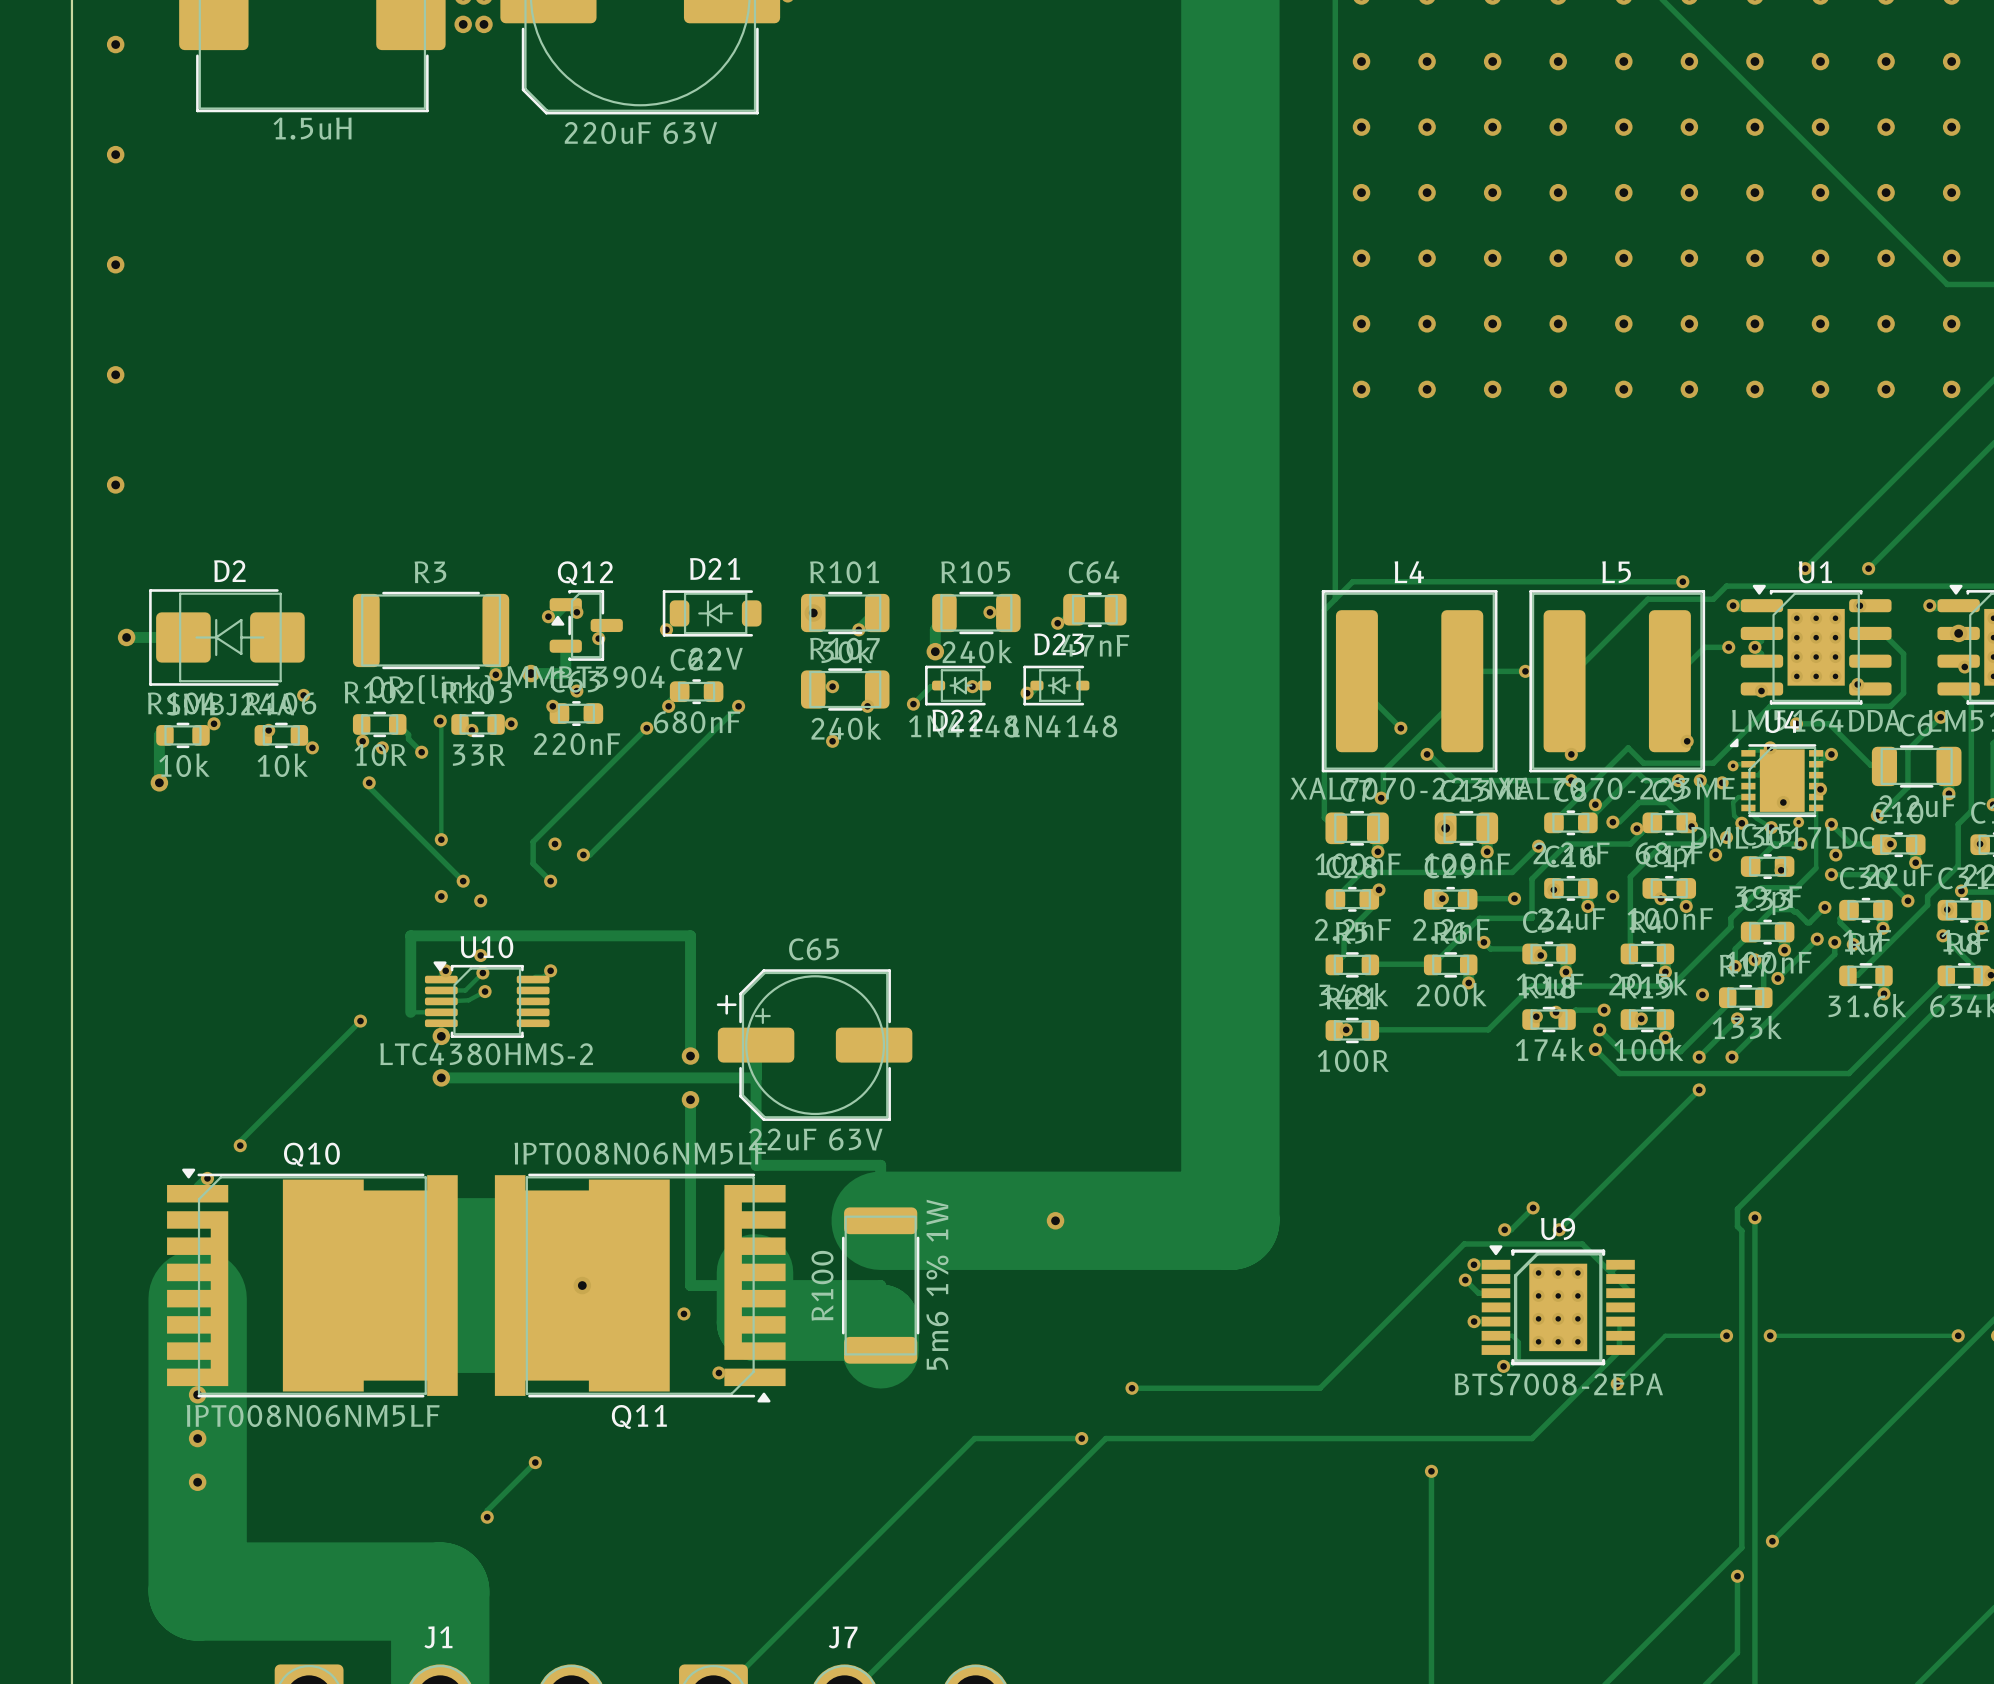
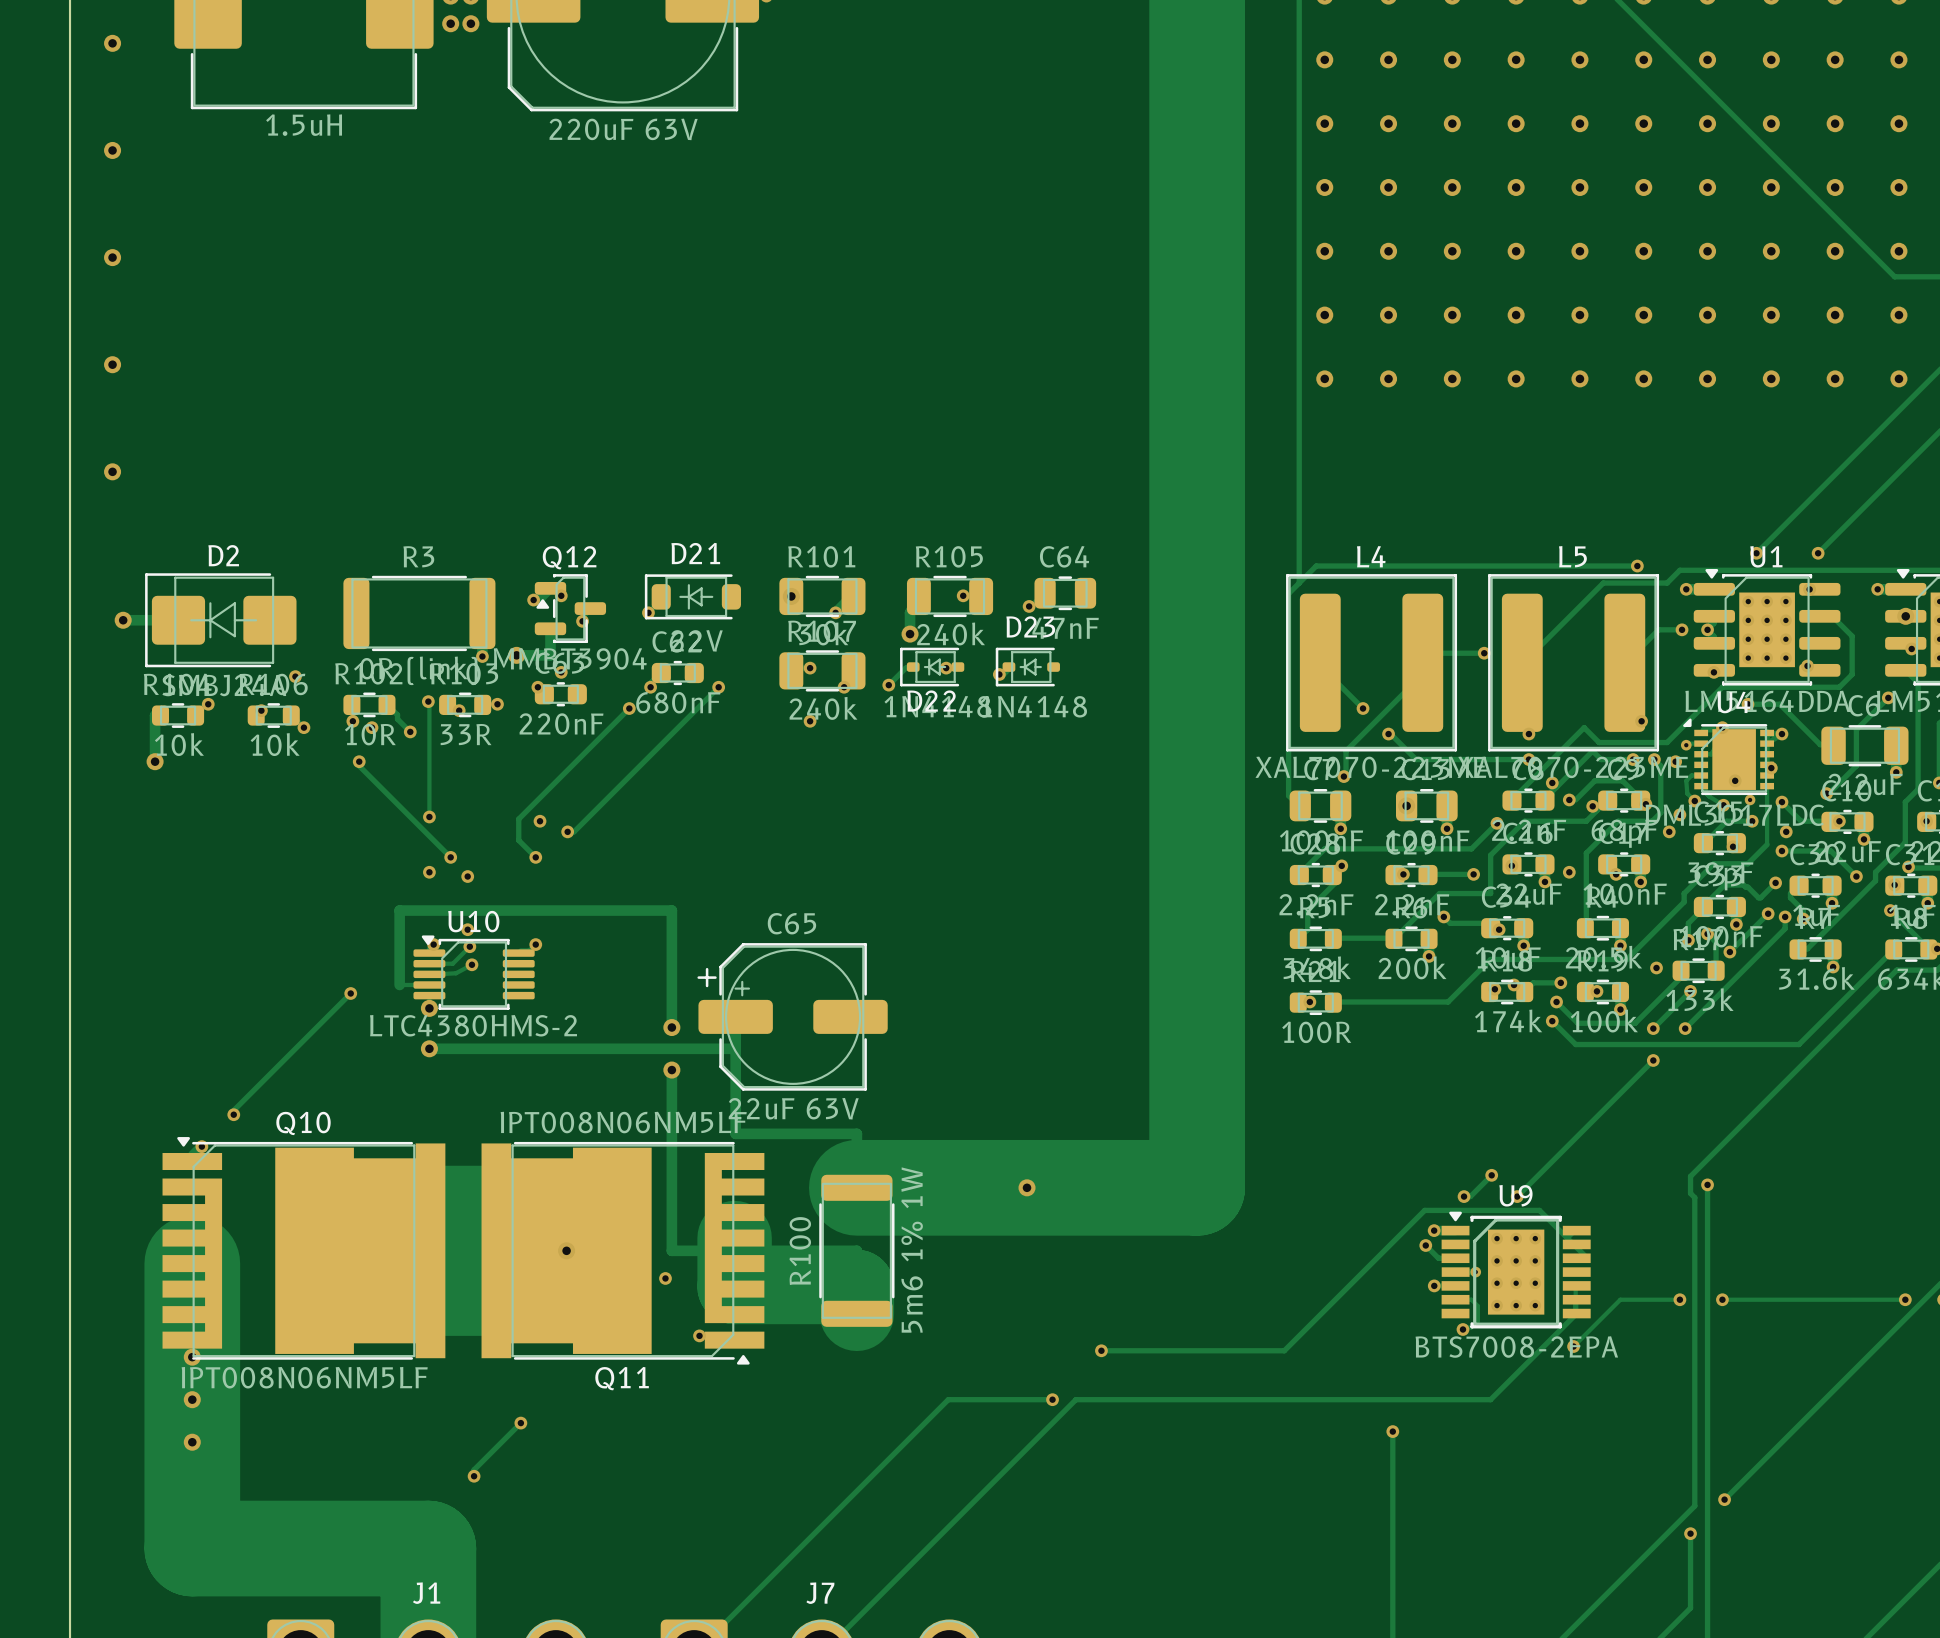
via: none -> (1475, 1272)

